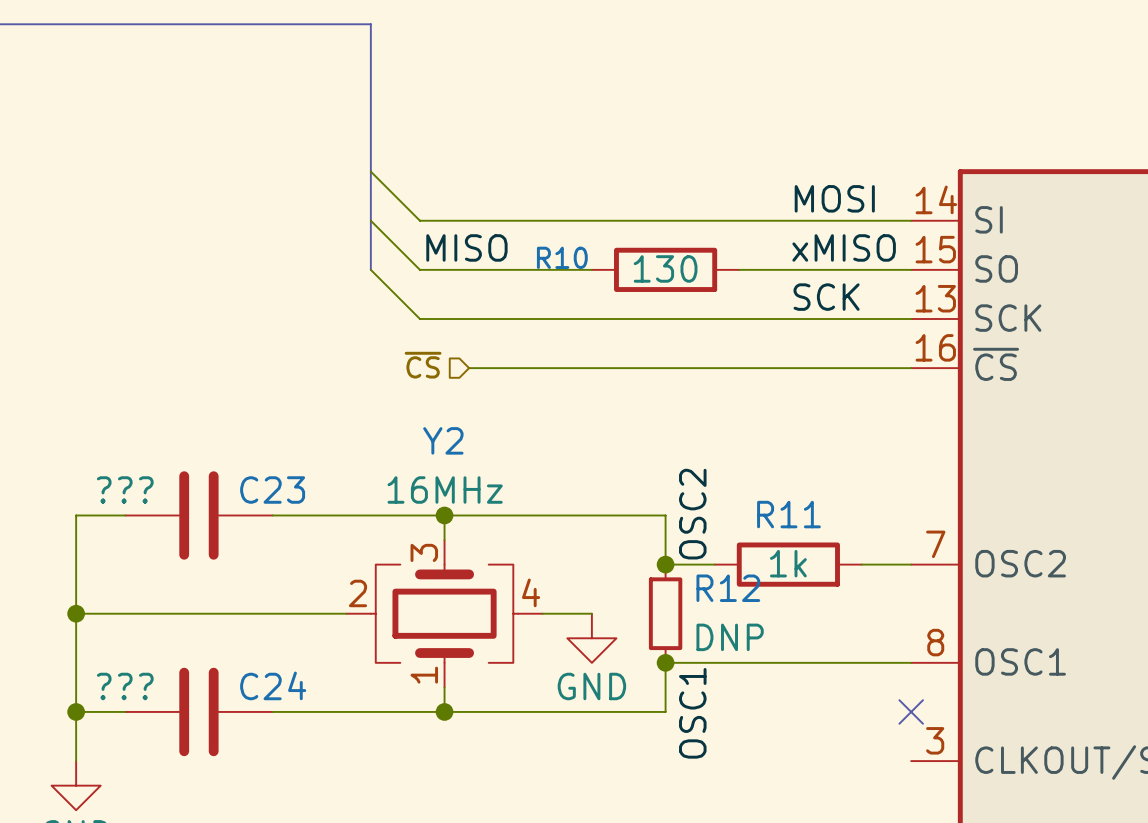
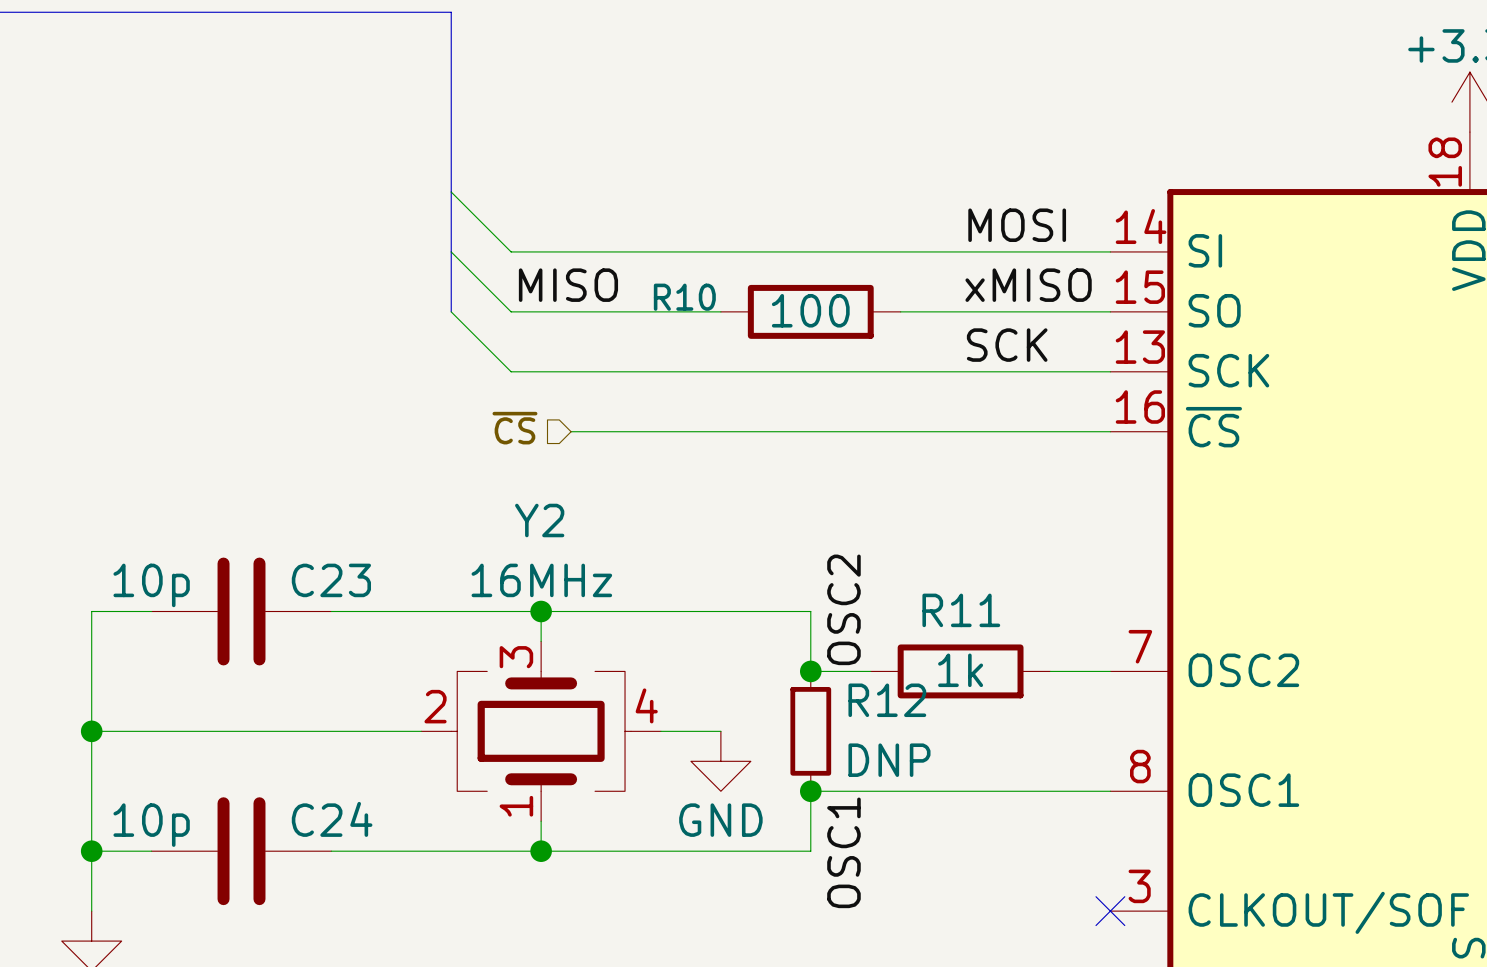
R10 value: 130 (665, 268) -> 100 (810, 310)
C23 value: ??? (125, 490) -> 10p (151, 585)
C24 value: ??? (125, 686) -> 10p (151, 825)
no-connect mark position: (911, 711) -> (1110, 911)

